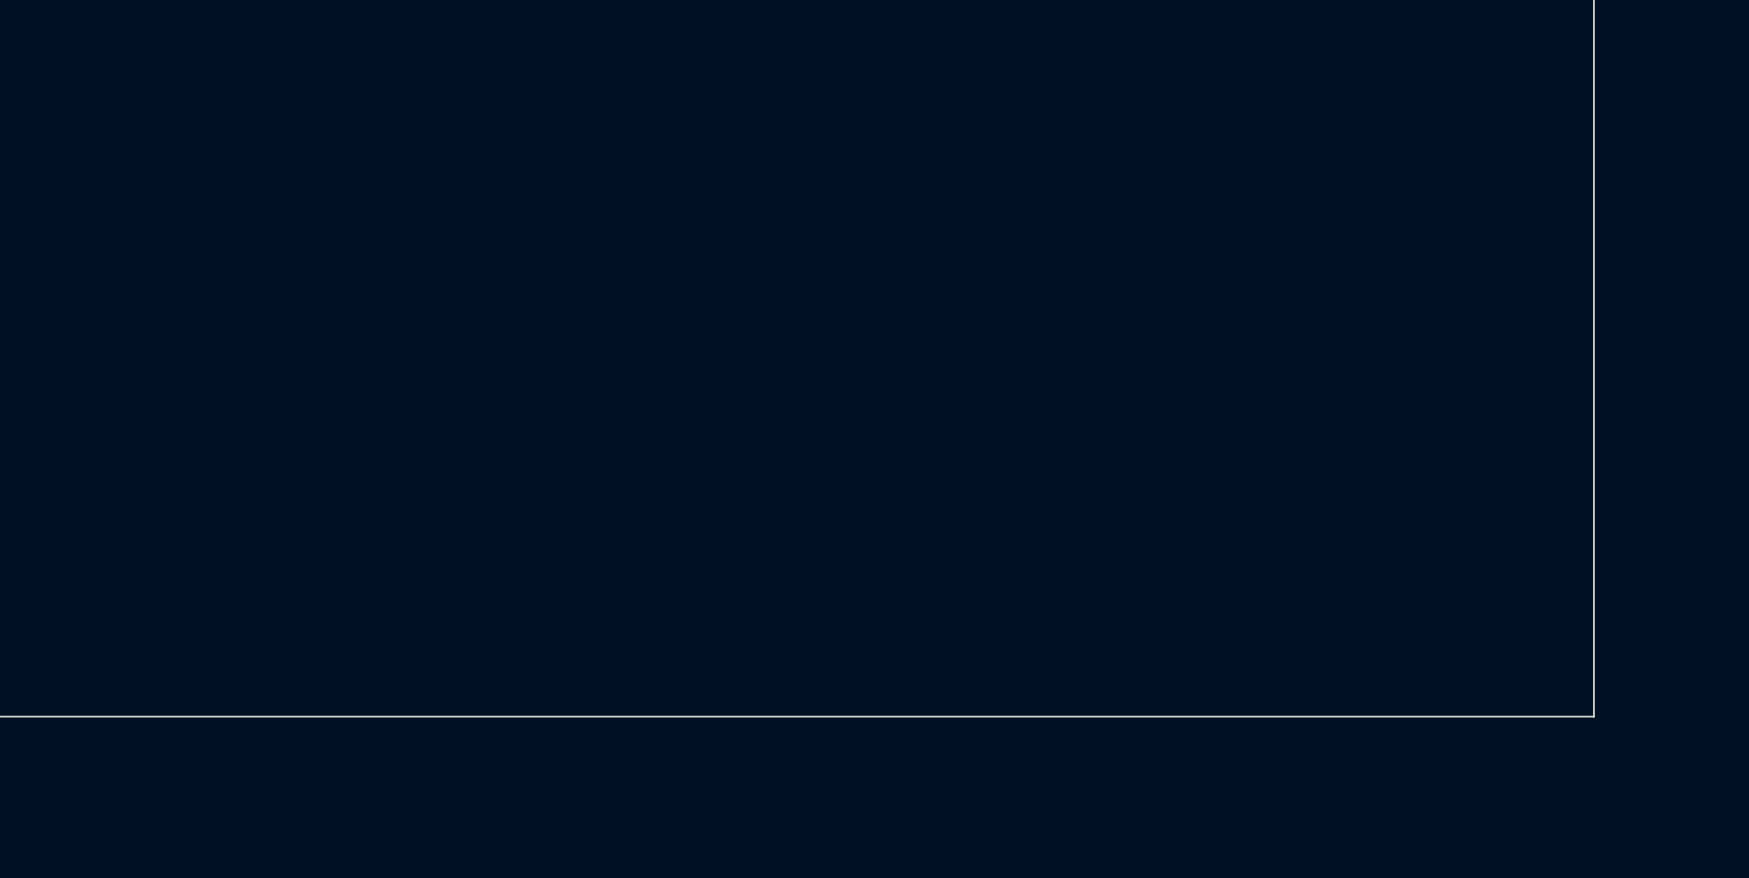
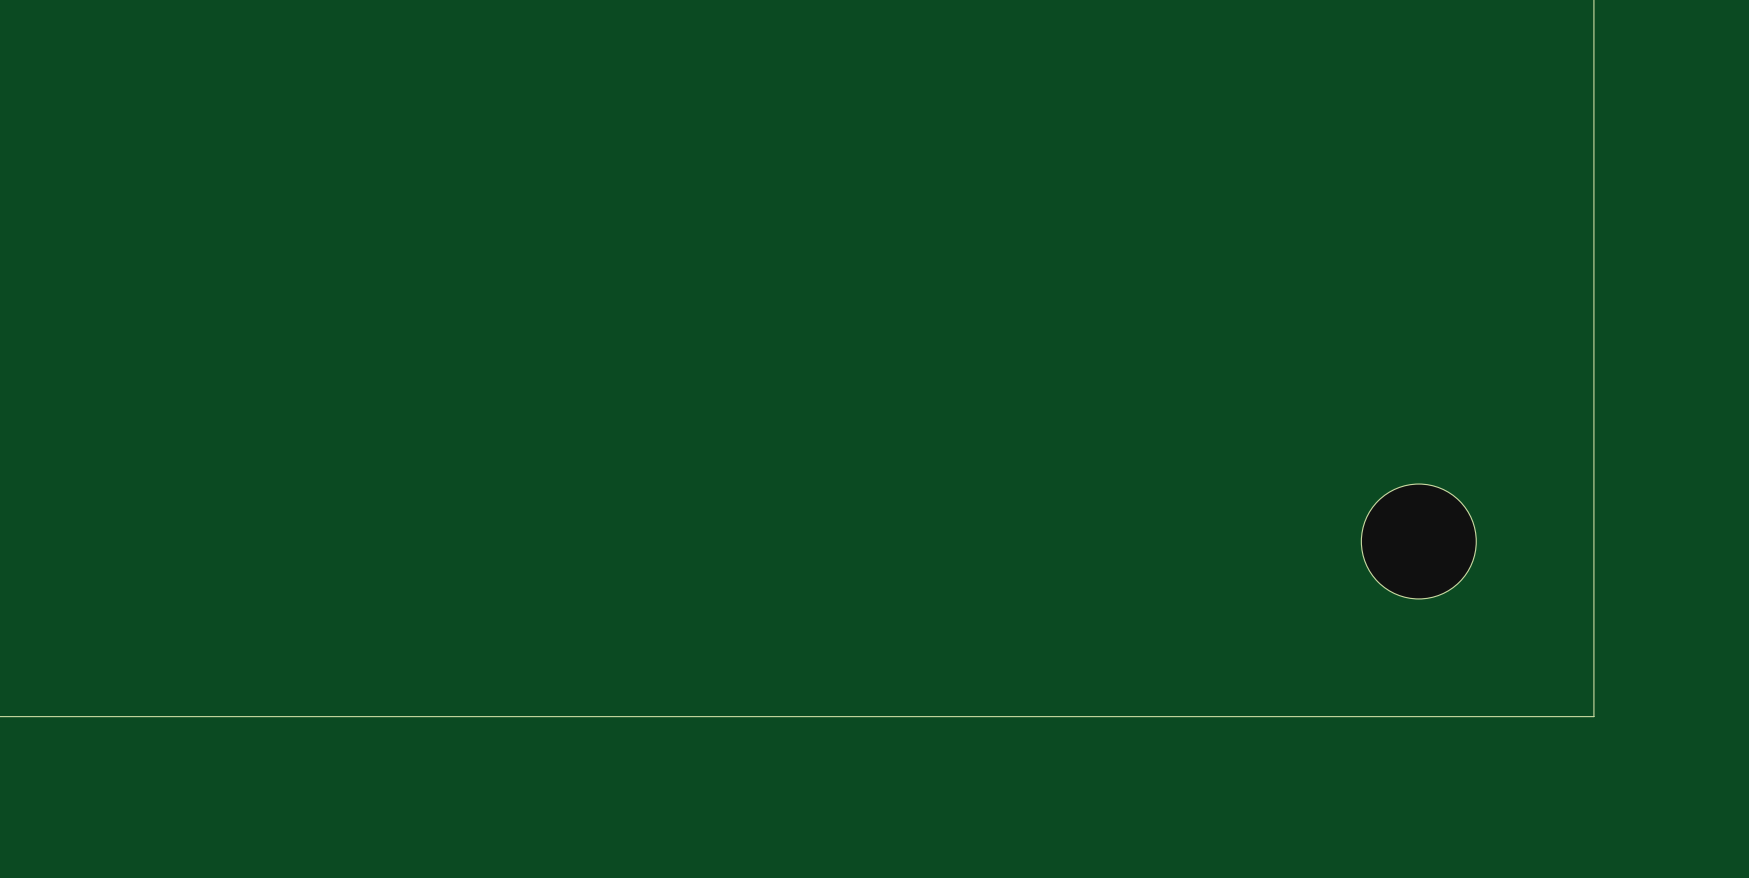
hole: none -> (1418, 541)

